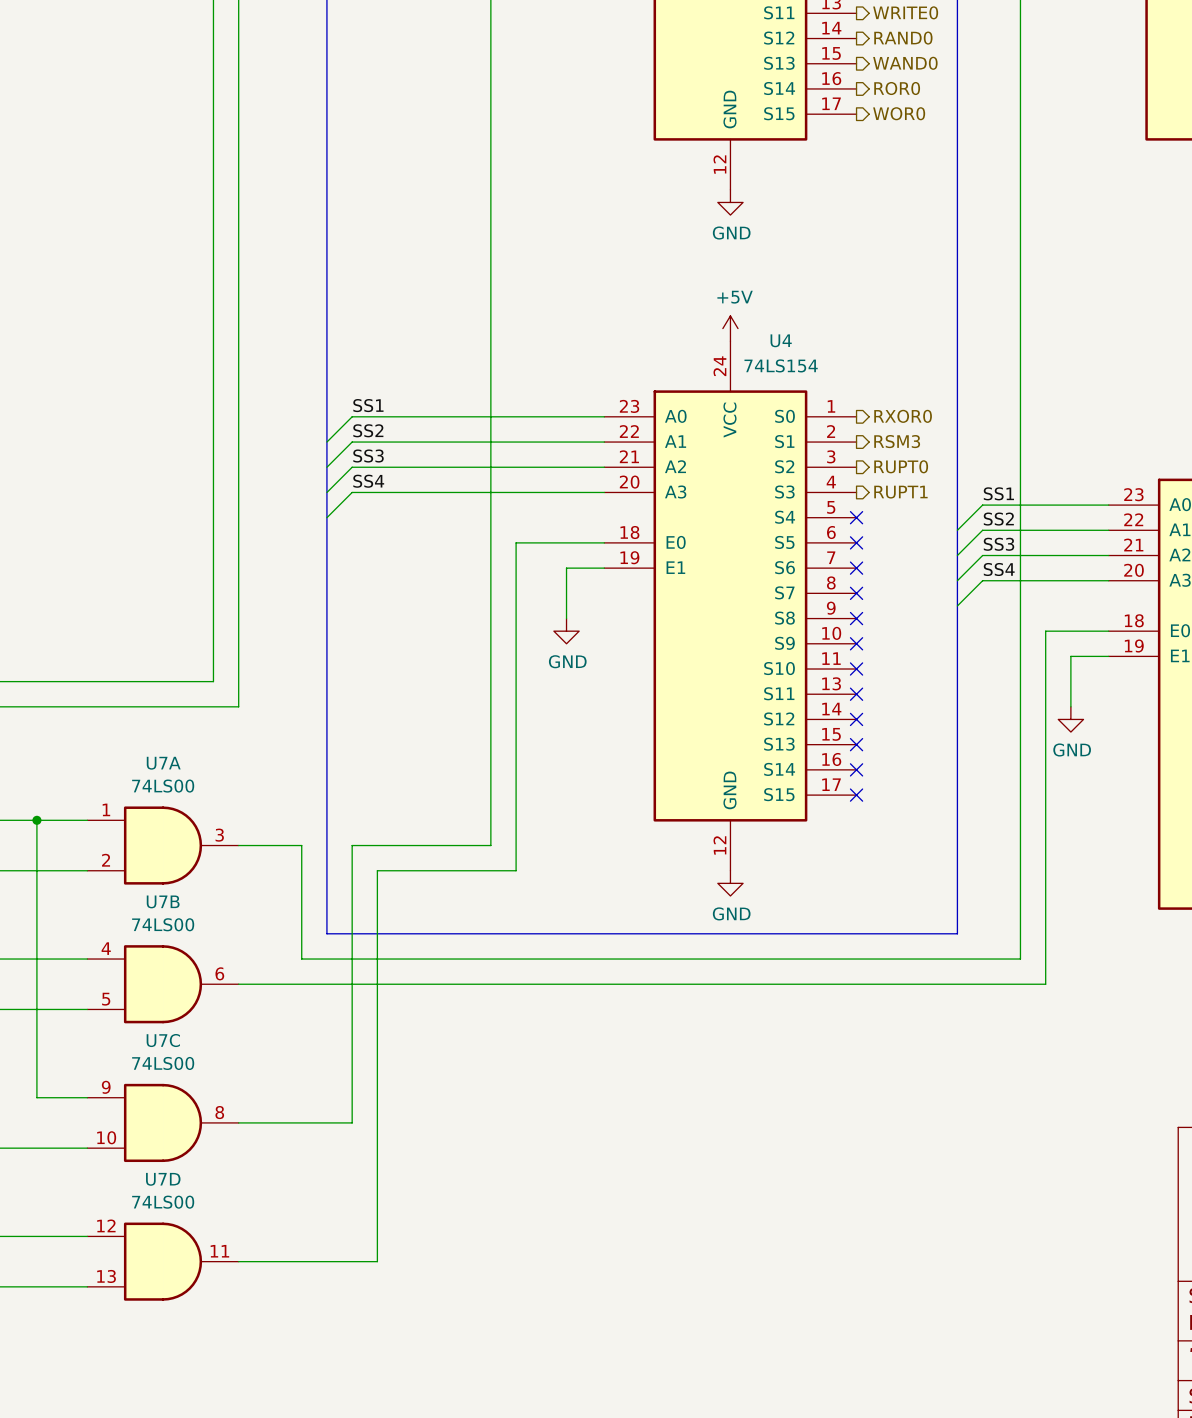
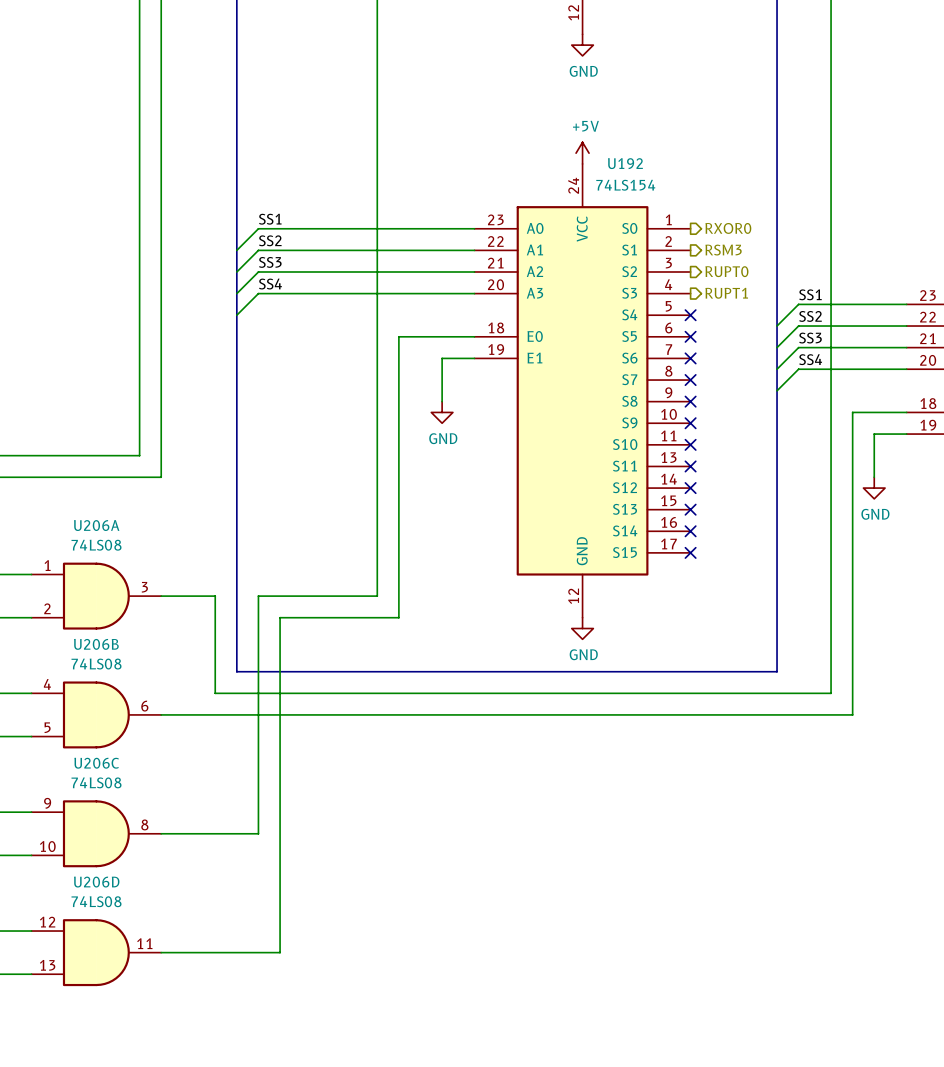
U4 name: U4 (781, 340) -> U192 (625, 163)
U7A name: U7A (163, 763) -> U206A (96, 525)
U7A value: 74LS00 (163, 786) -> 74LS08 (96, 545)
U7B name: U7B (163, 901) -> U206B (96, 644)
U7B value: 74LS00 (163, 924) -> 74LS08 (96, 664)
U7C name: U7C (163, 1040) -> U206C (96, 763)
U7C value: 74LS00 (163, 1063) -> 74LS08 (96, 782)
U7D name: U7D (163, 1179) -> U206D (96, 882)
U7D value: 74LS00 (163, 1202) -> 74LS08 (96, 901)

